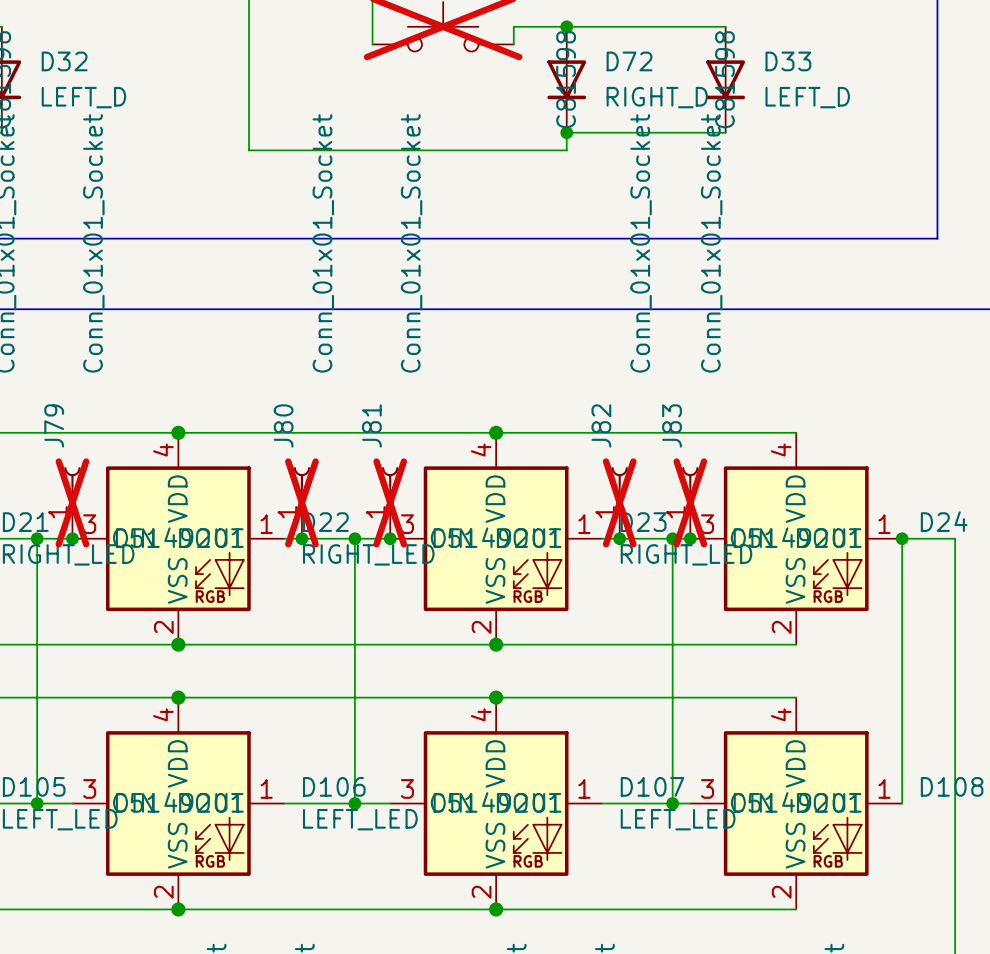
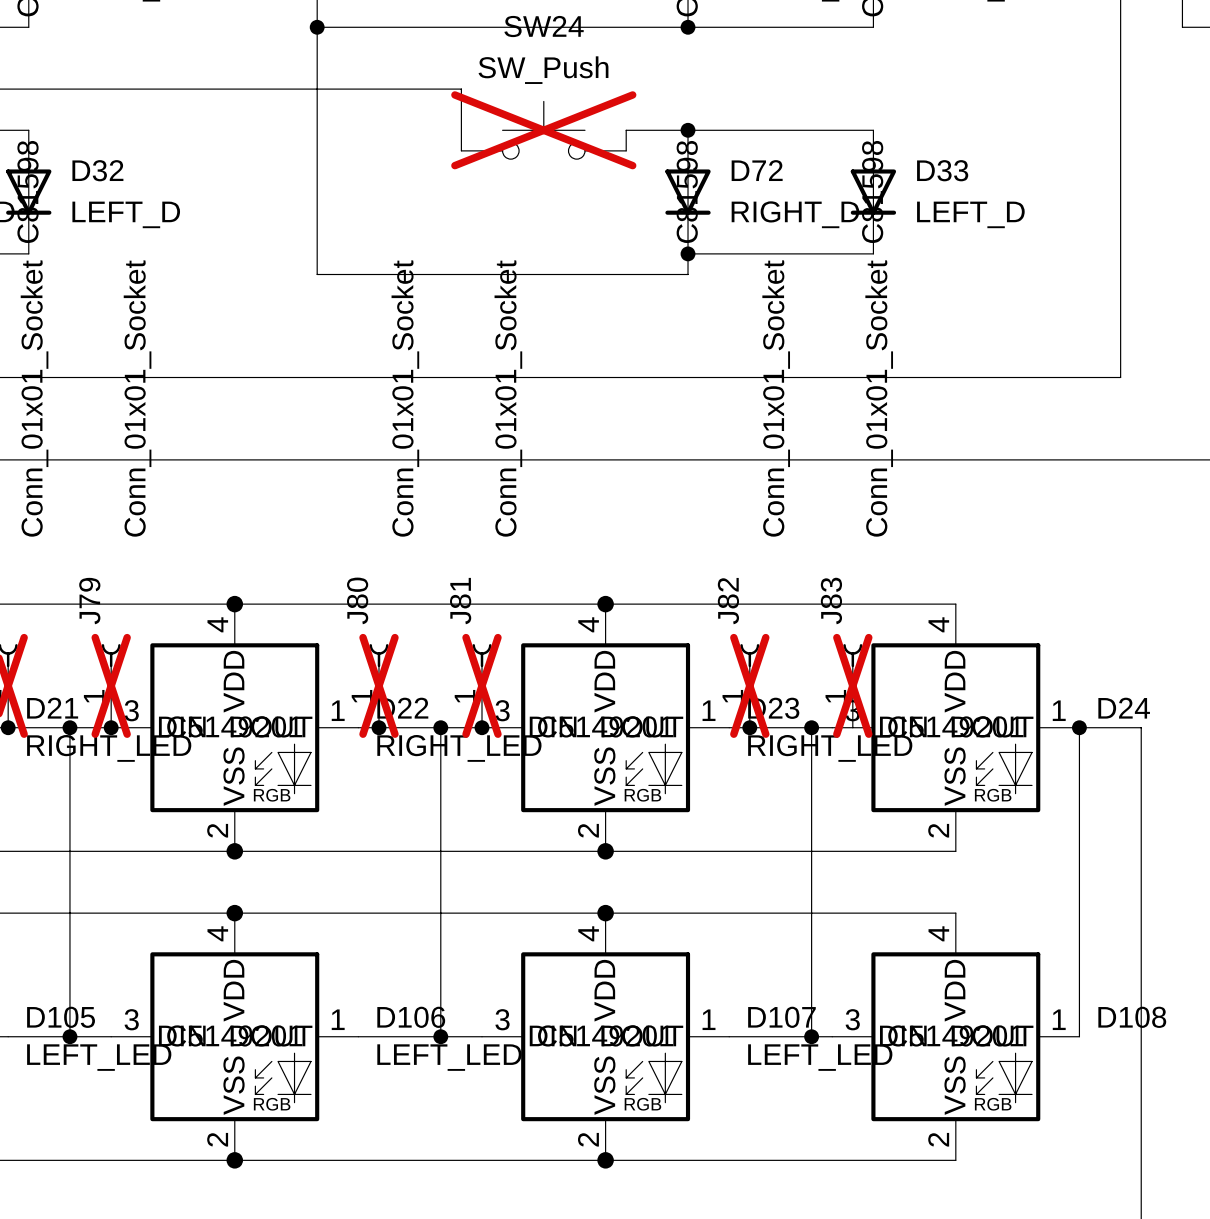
J83 position: (690, 502) -> (852, 685)
junction: (690, 538) -> none

